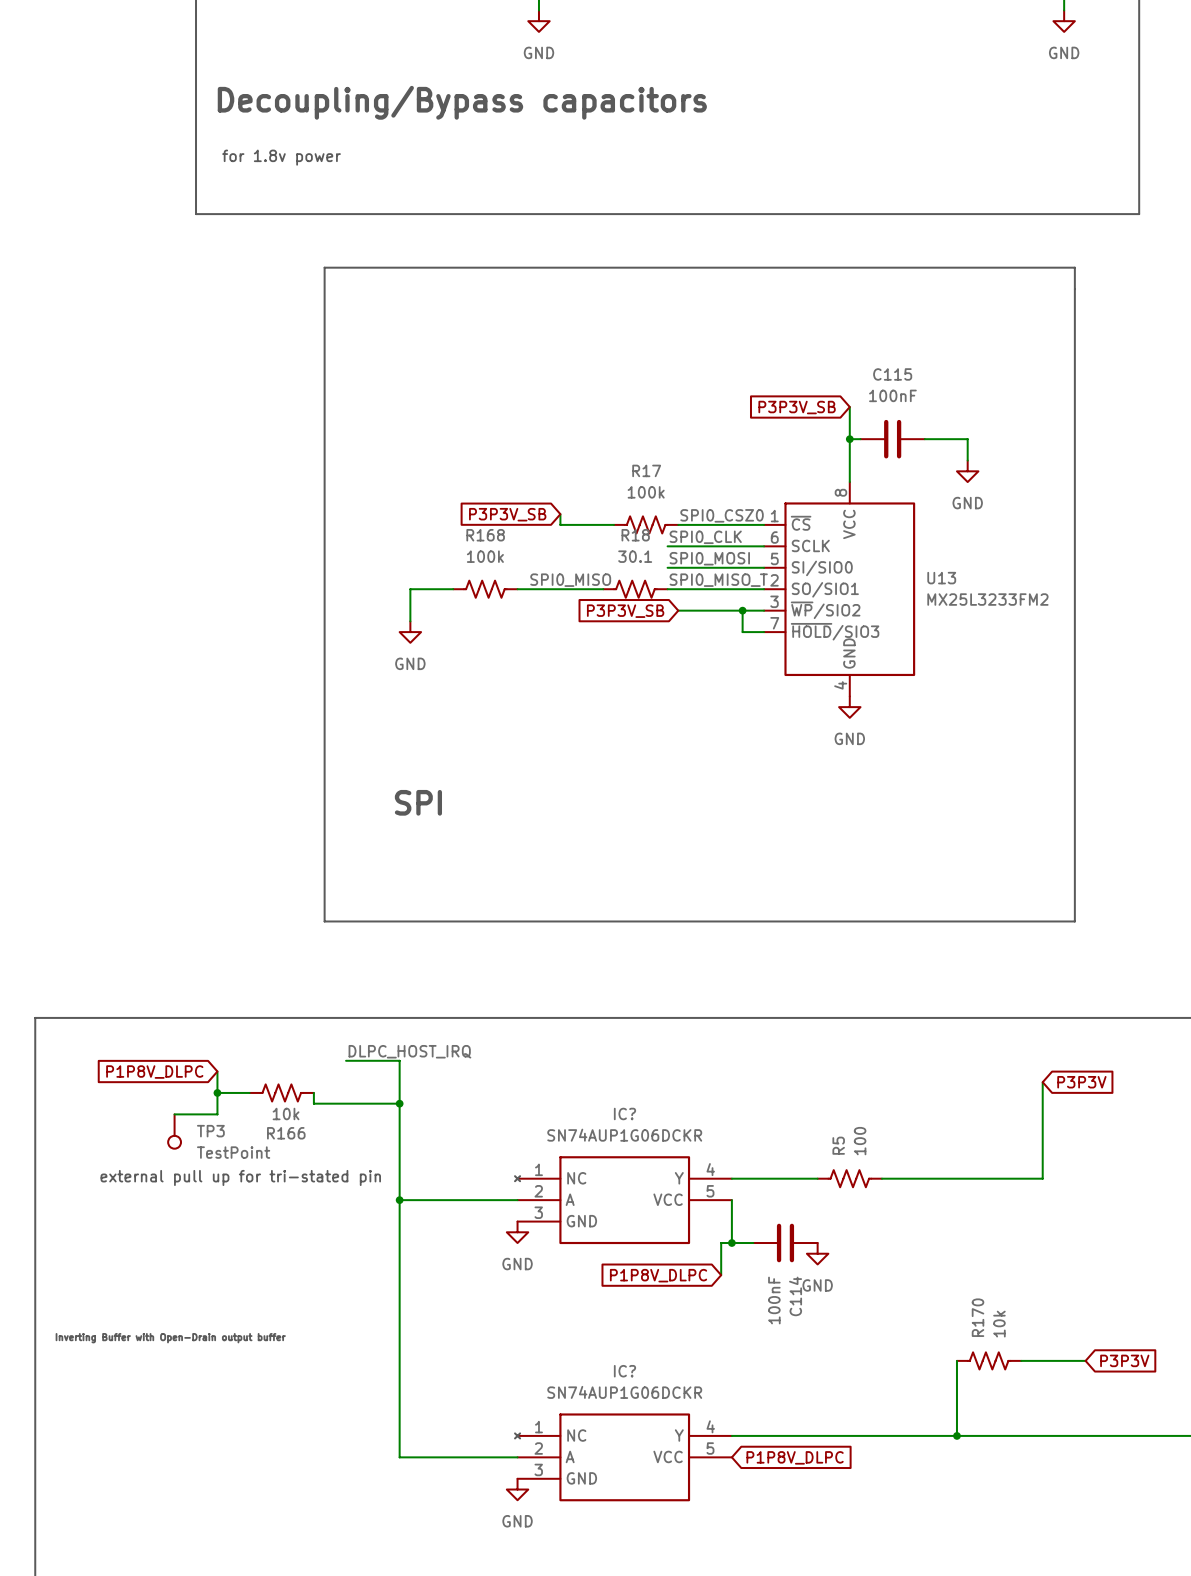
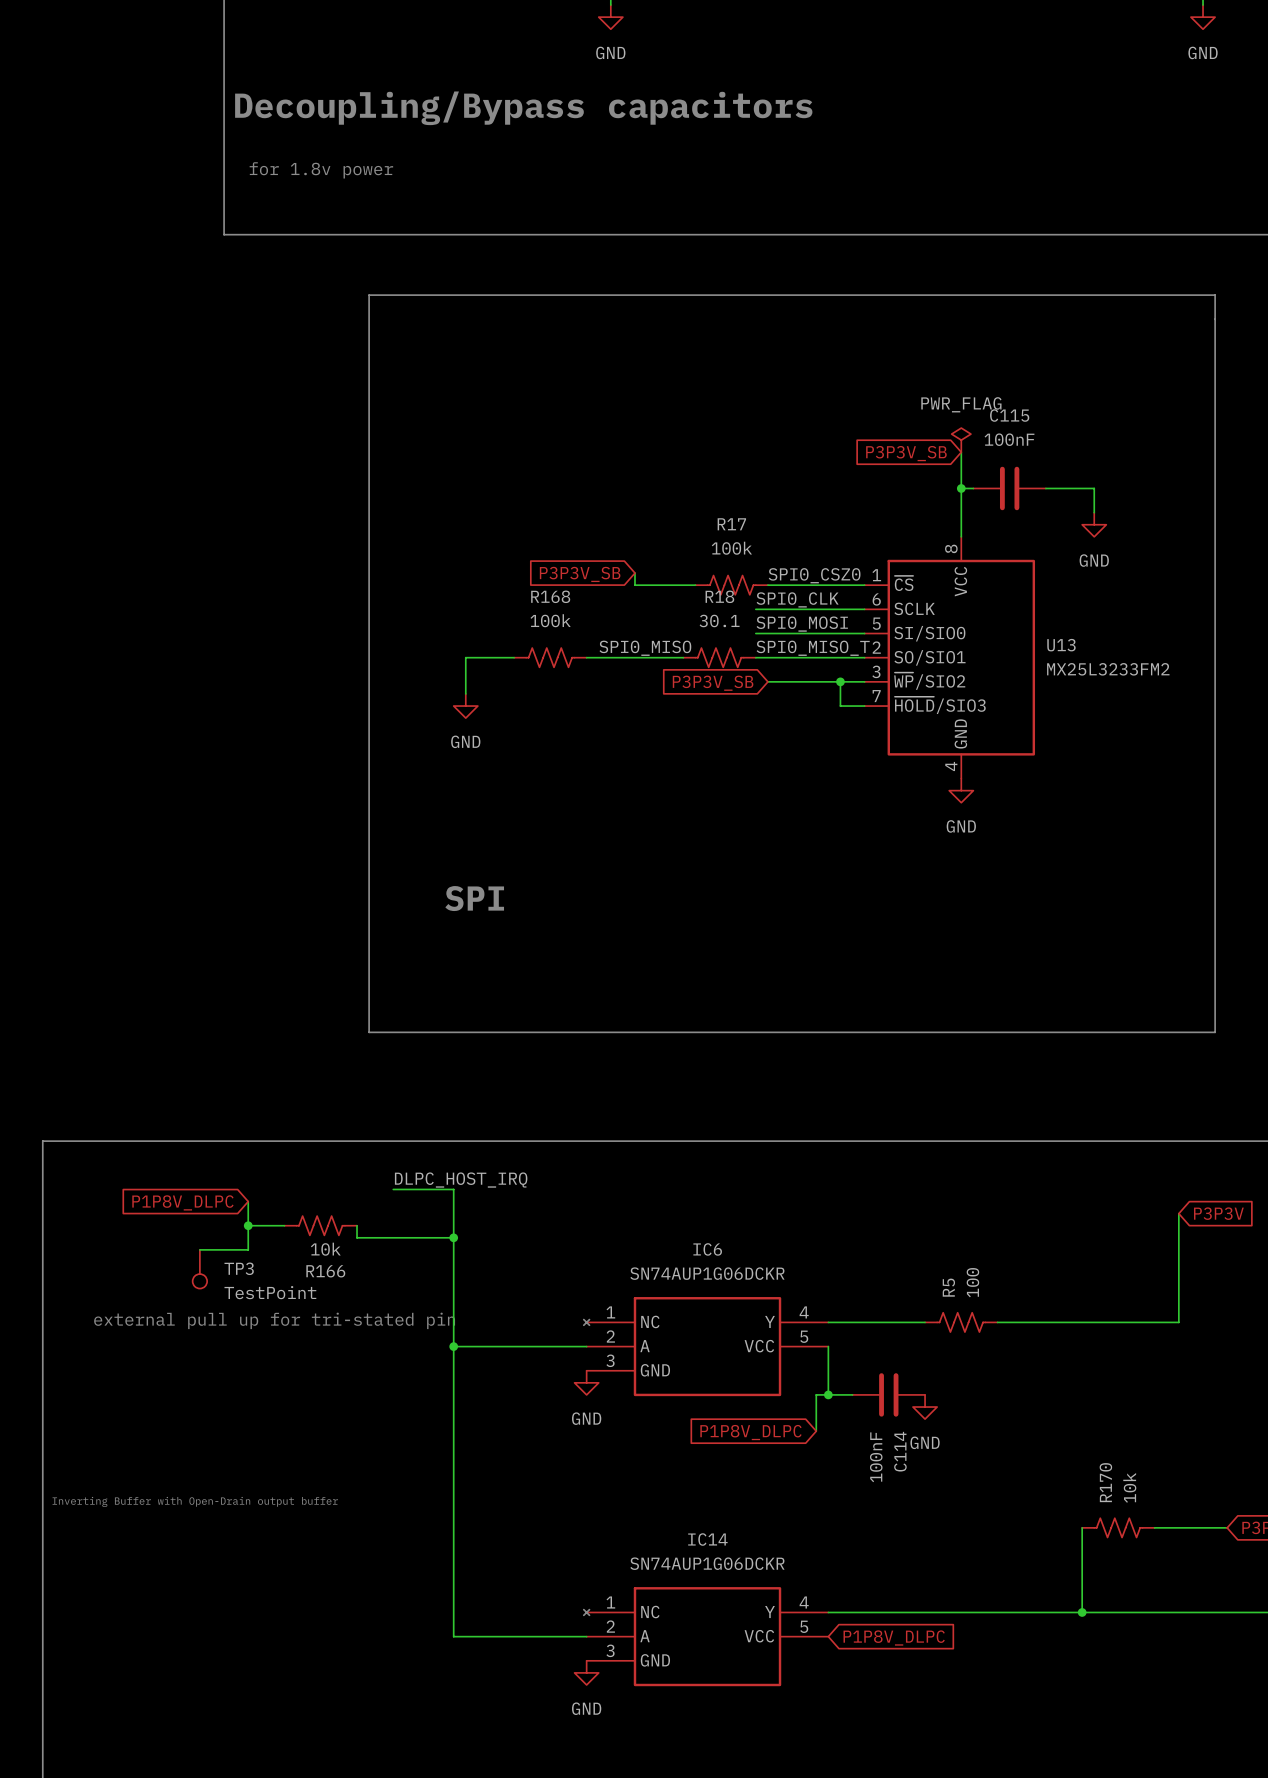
power symbol: none -> PWR_FLAG (961, 440)
IC? name: IC? (624, 1113) -> IC6 (707, 1249)
IC? name: IC? (624, 1371) -> IC14 (707, 1539)

